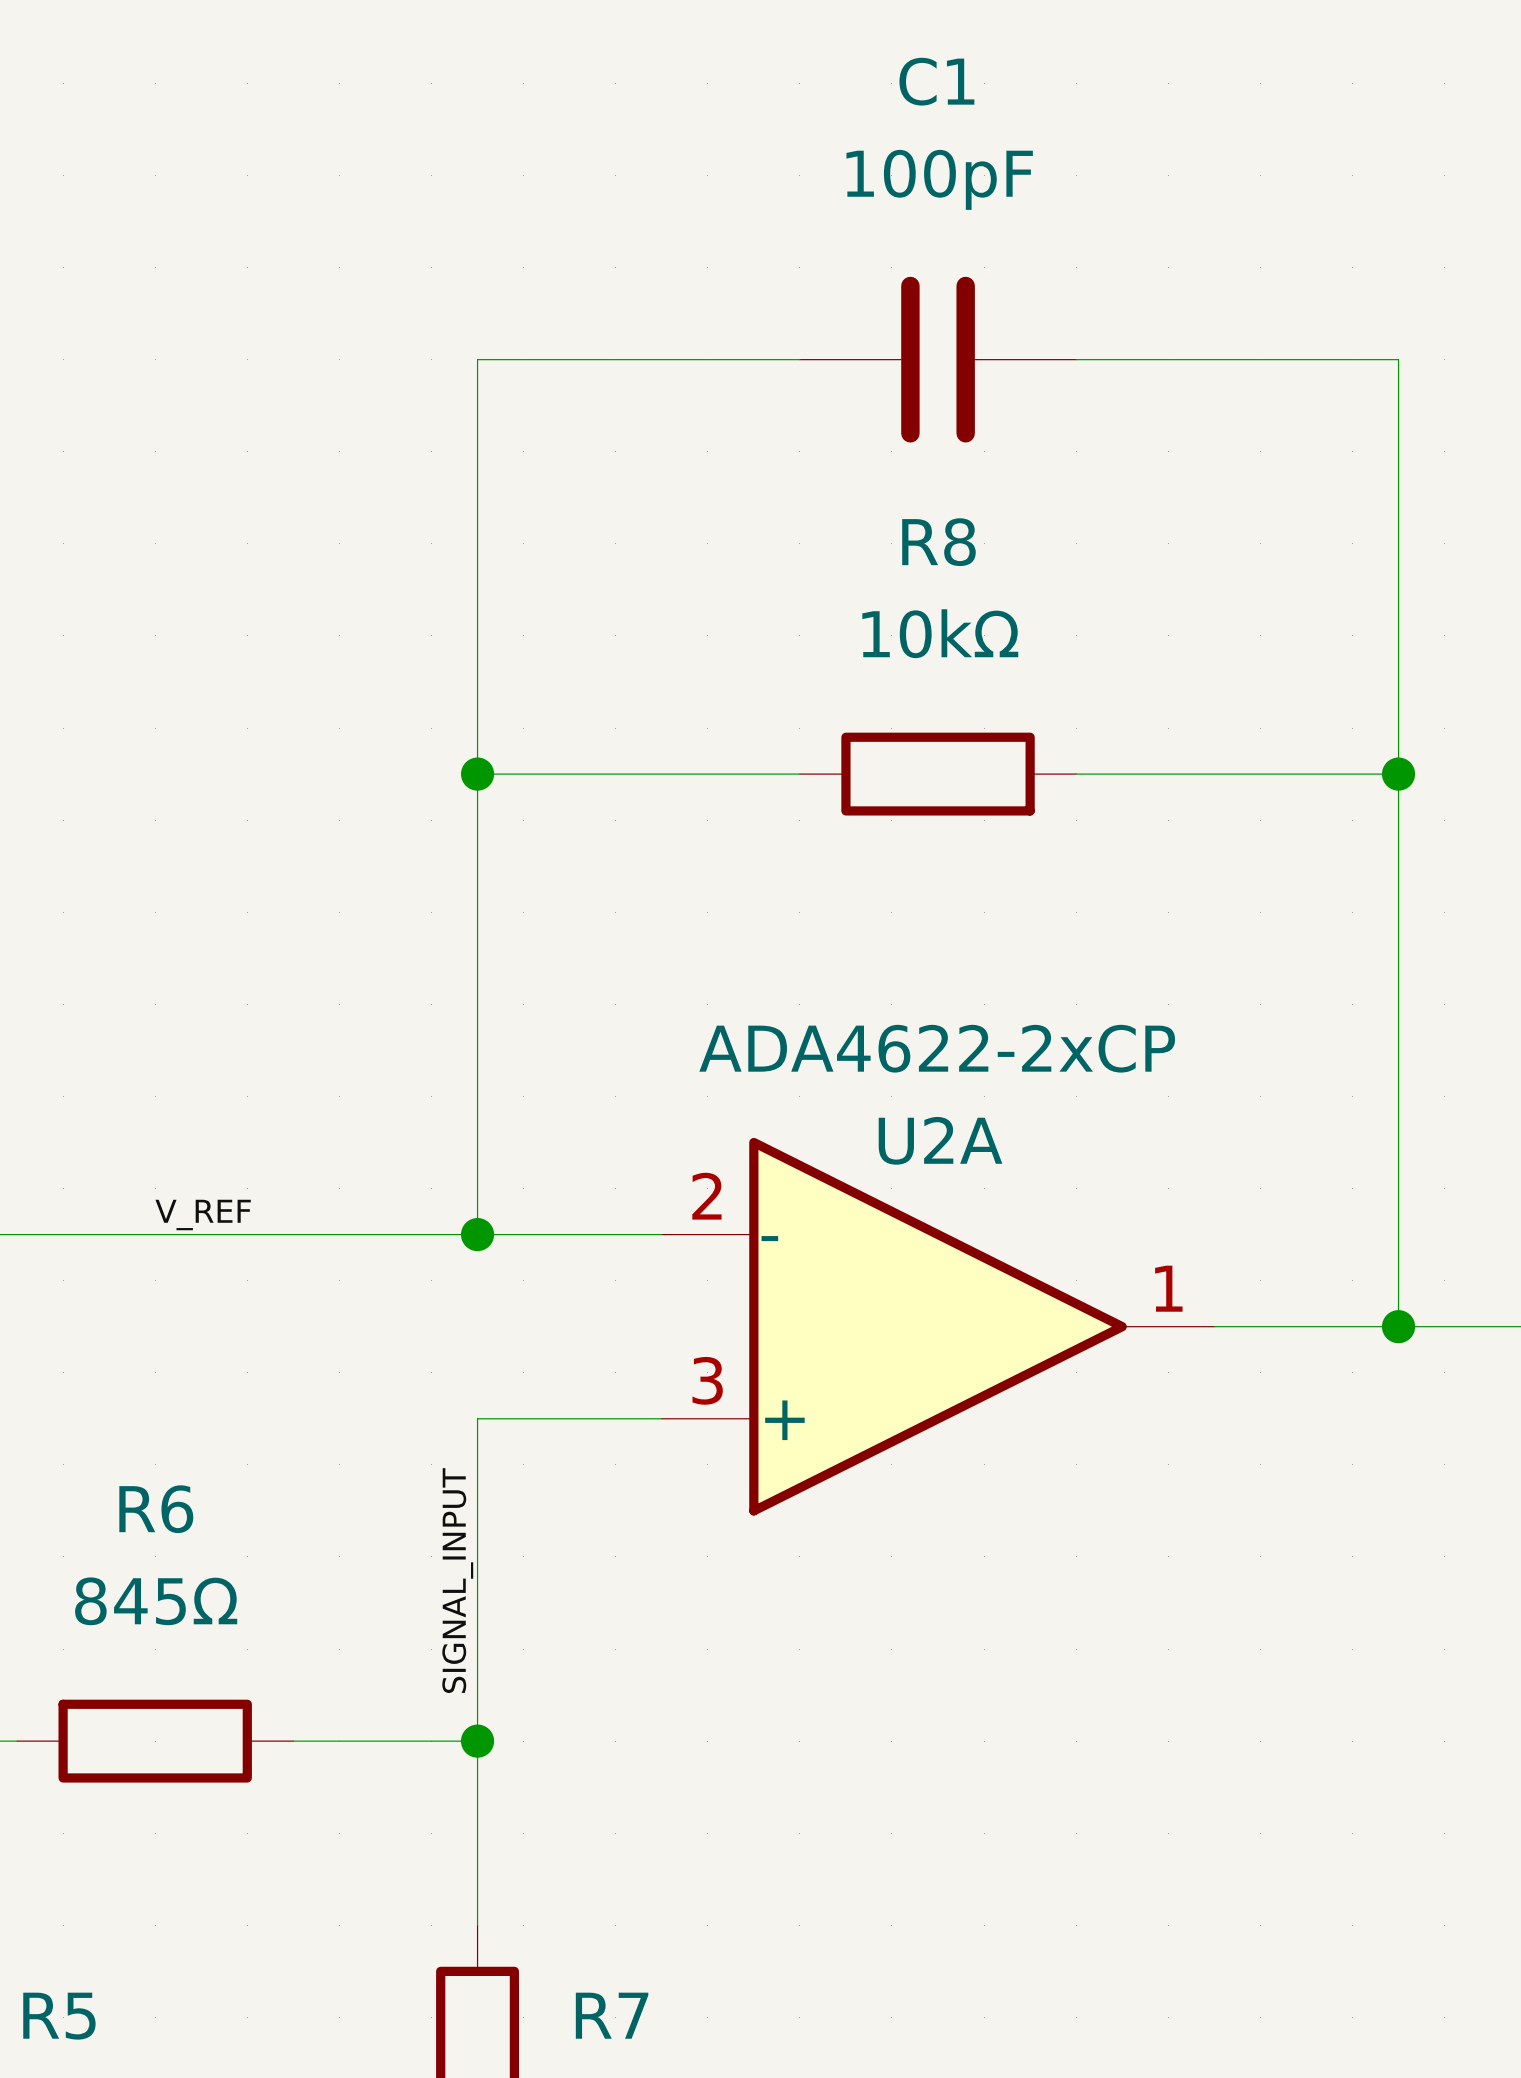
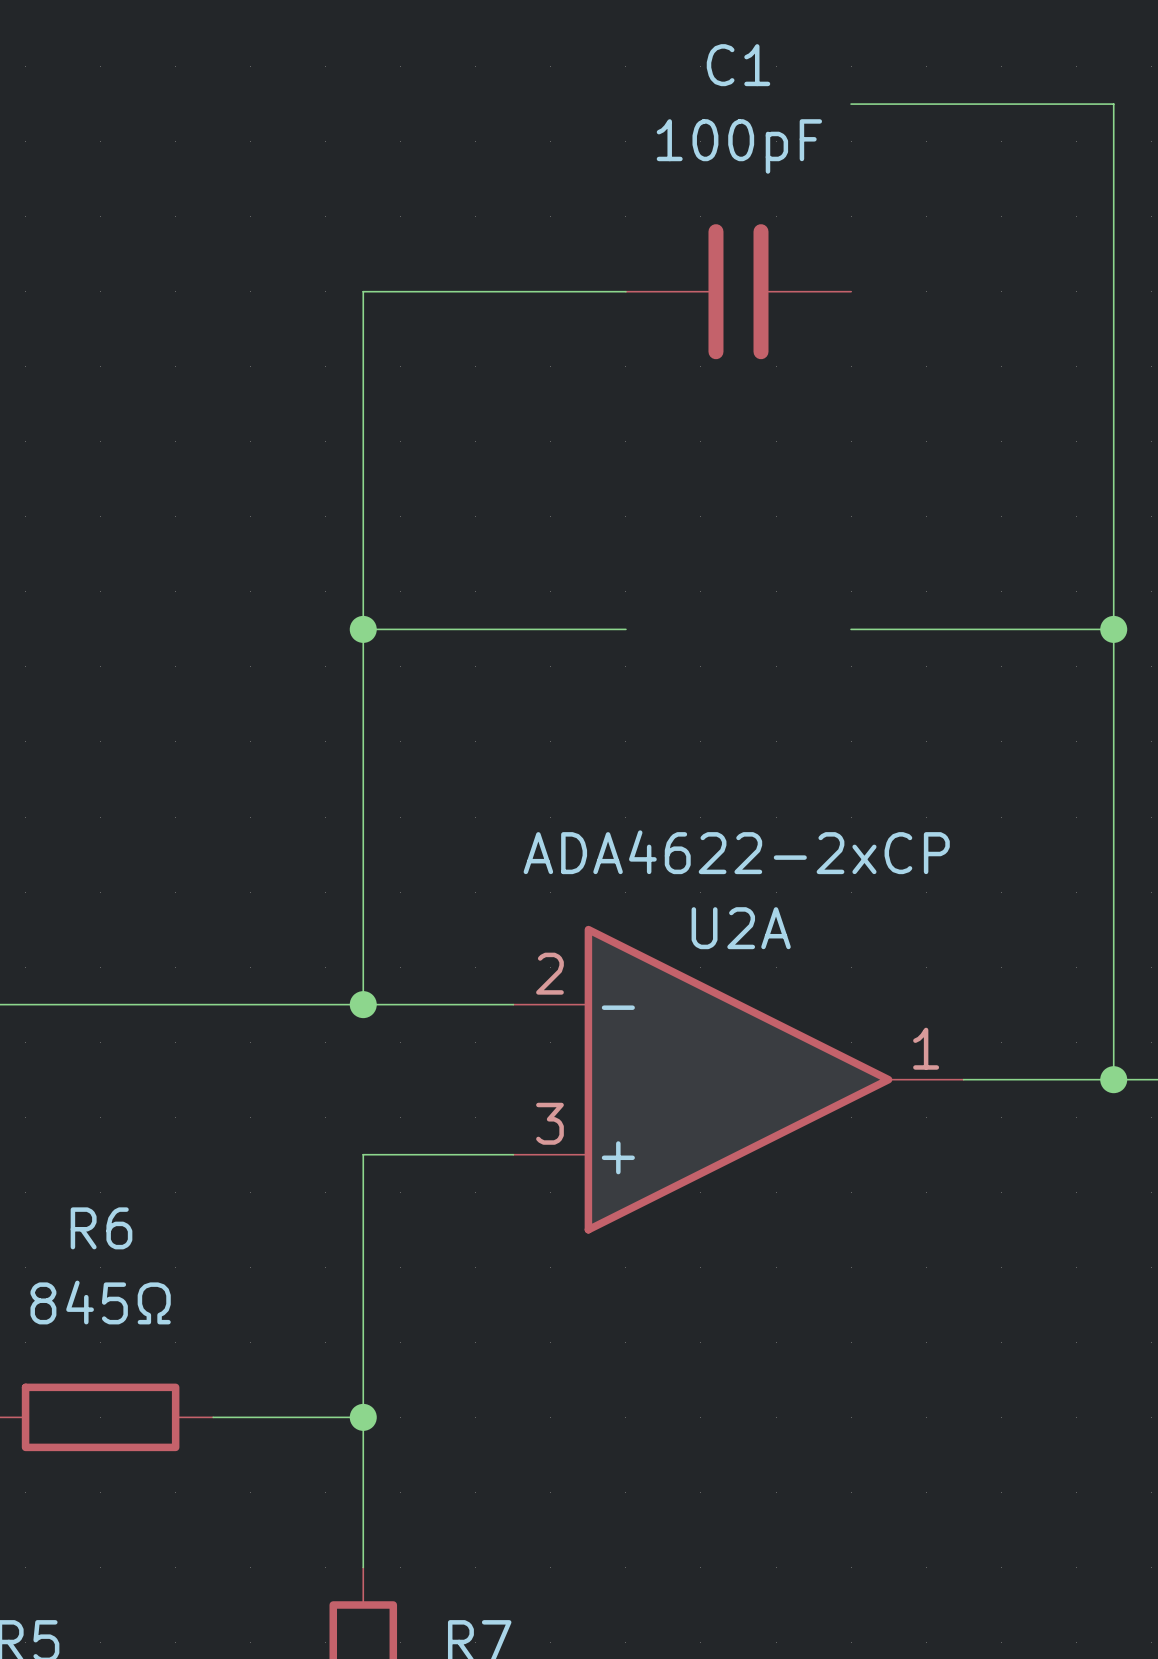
wire: (1076, 359) (1398, 359) -> (851, 104) (1113, 104) (1113, 291)
R8: 10kΩ (938, 774) -> none
label: V_REF (203, 1215) -> none
label: SIGNAL_INPUT (457, 1580) -> none

